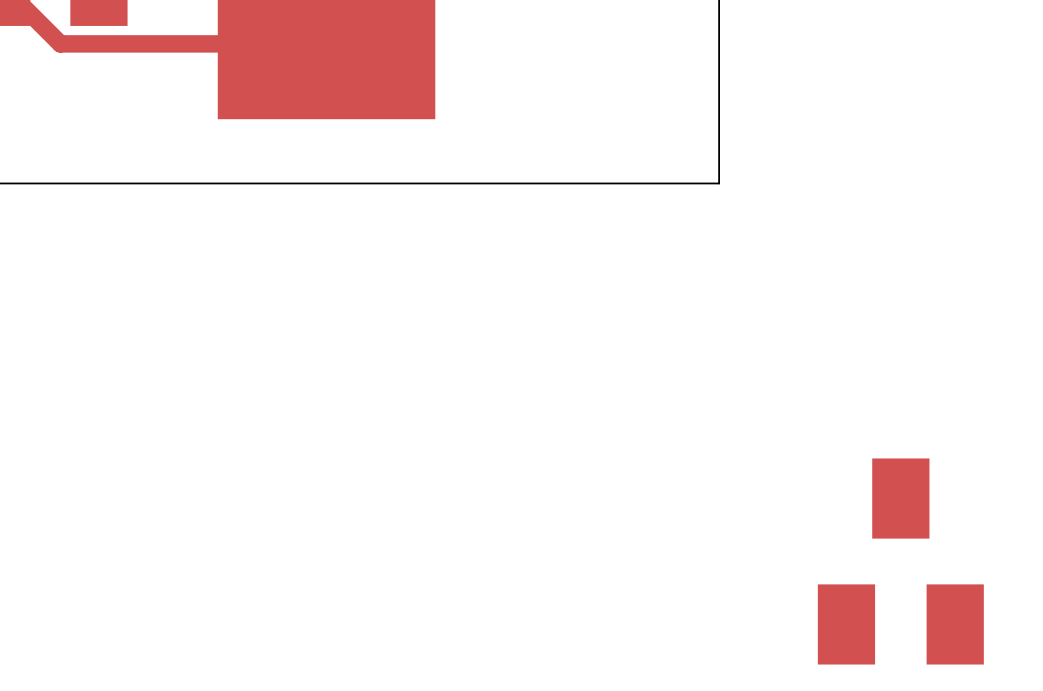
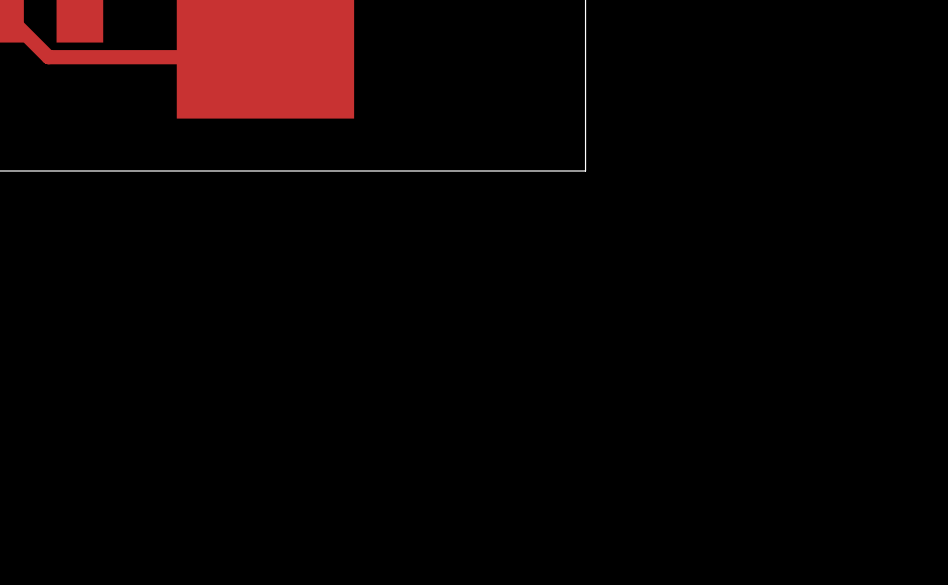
part: (900, 561) -> none

